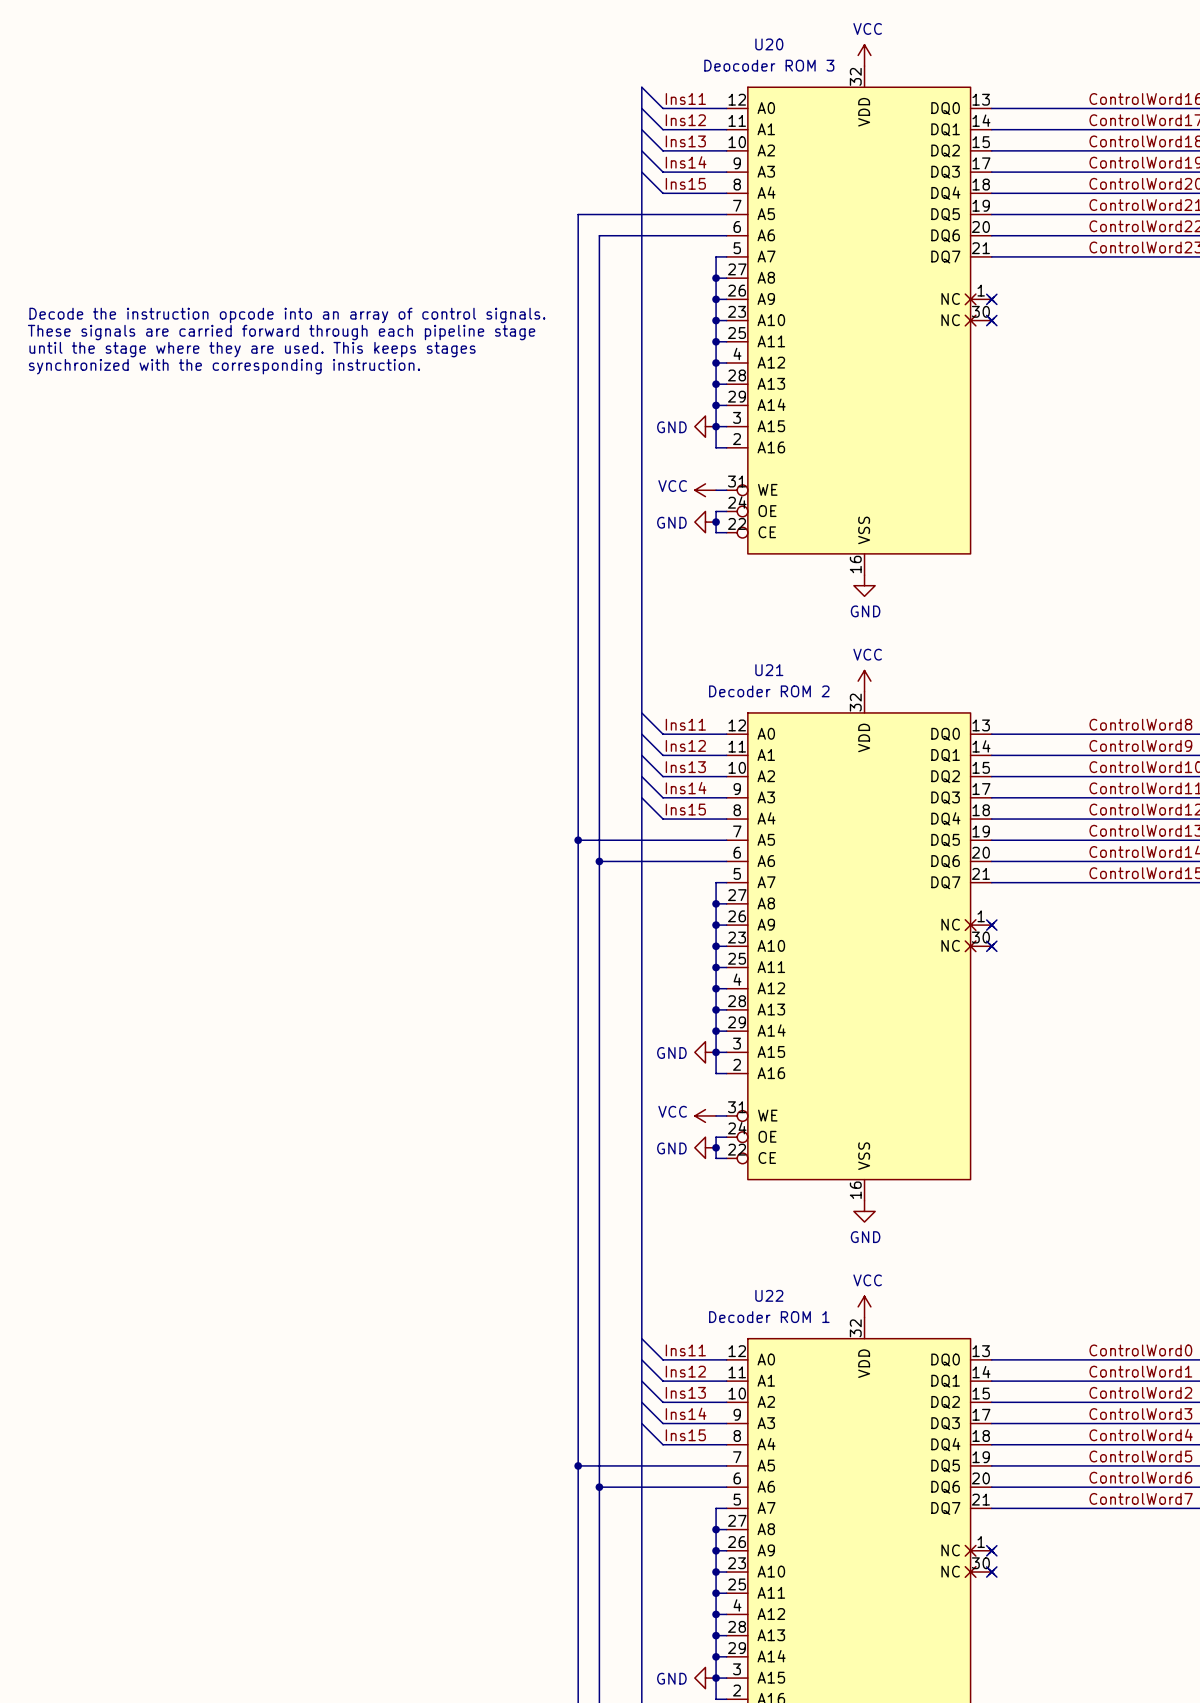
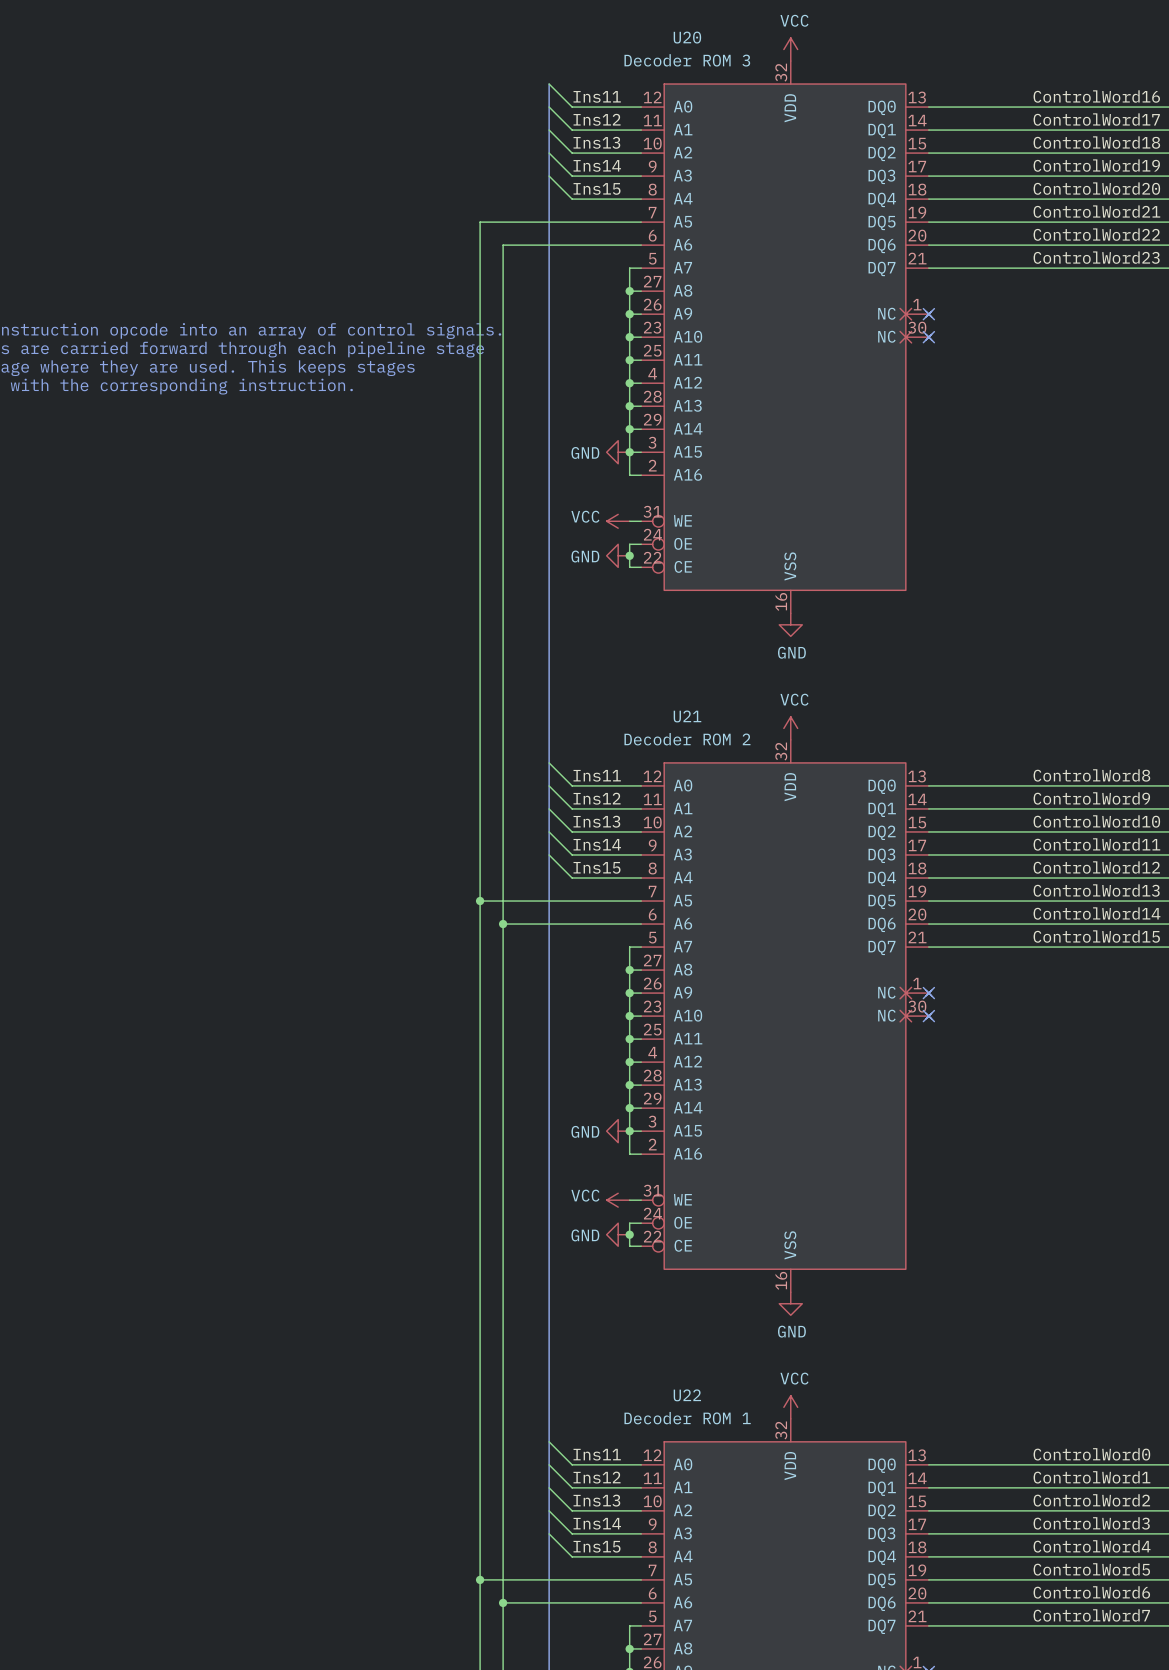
U20 value: Deocoder ROM 3 (769, 65) -> Decoder ROM 3 (687, 60)

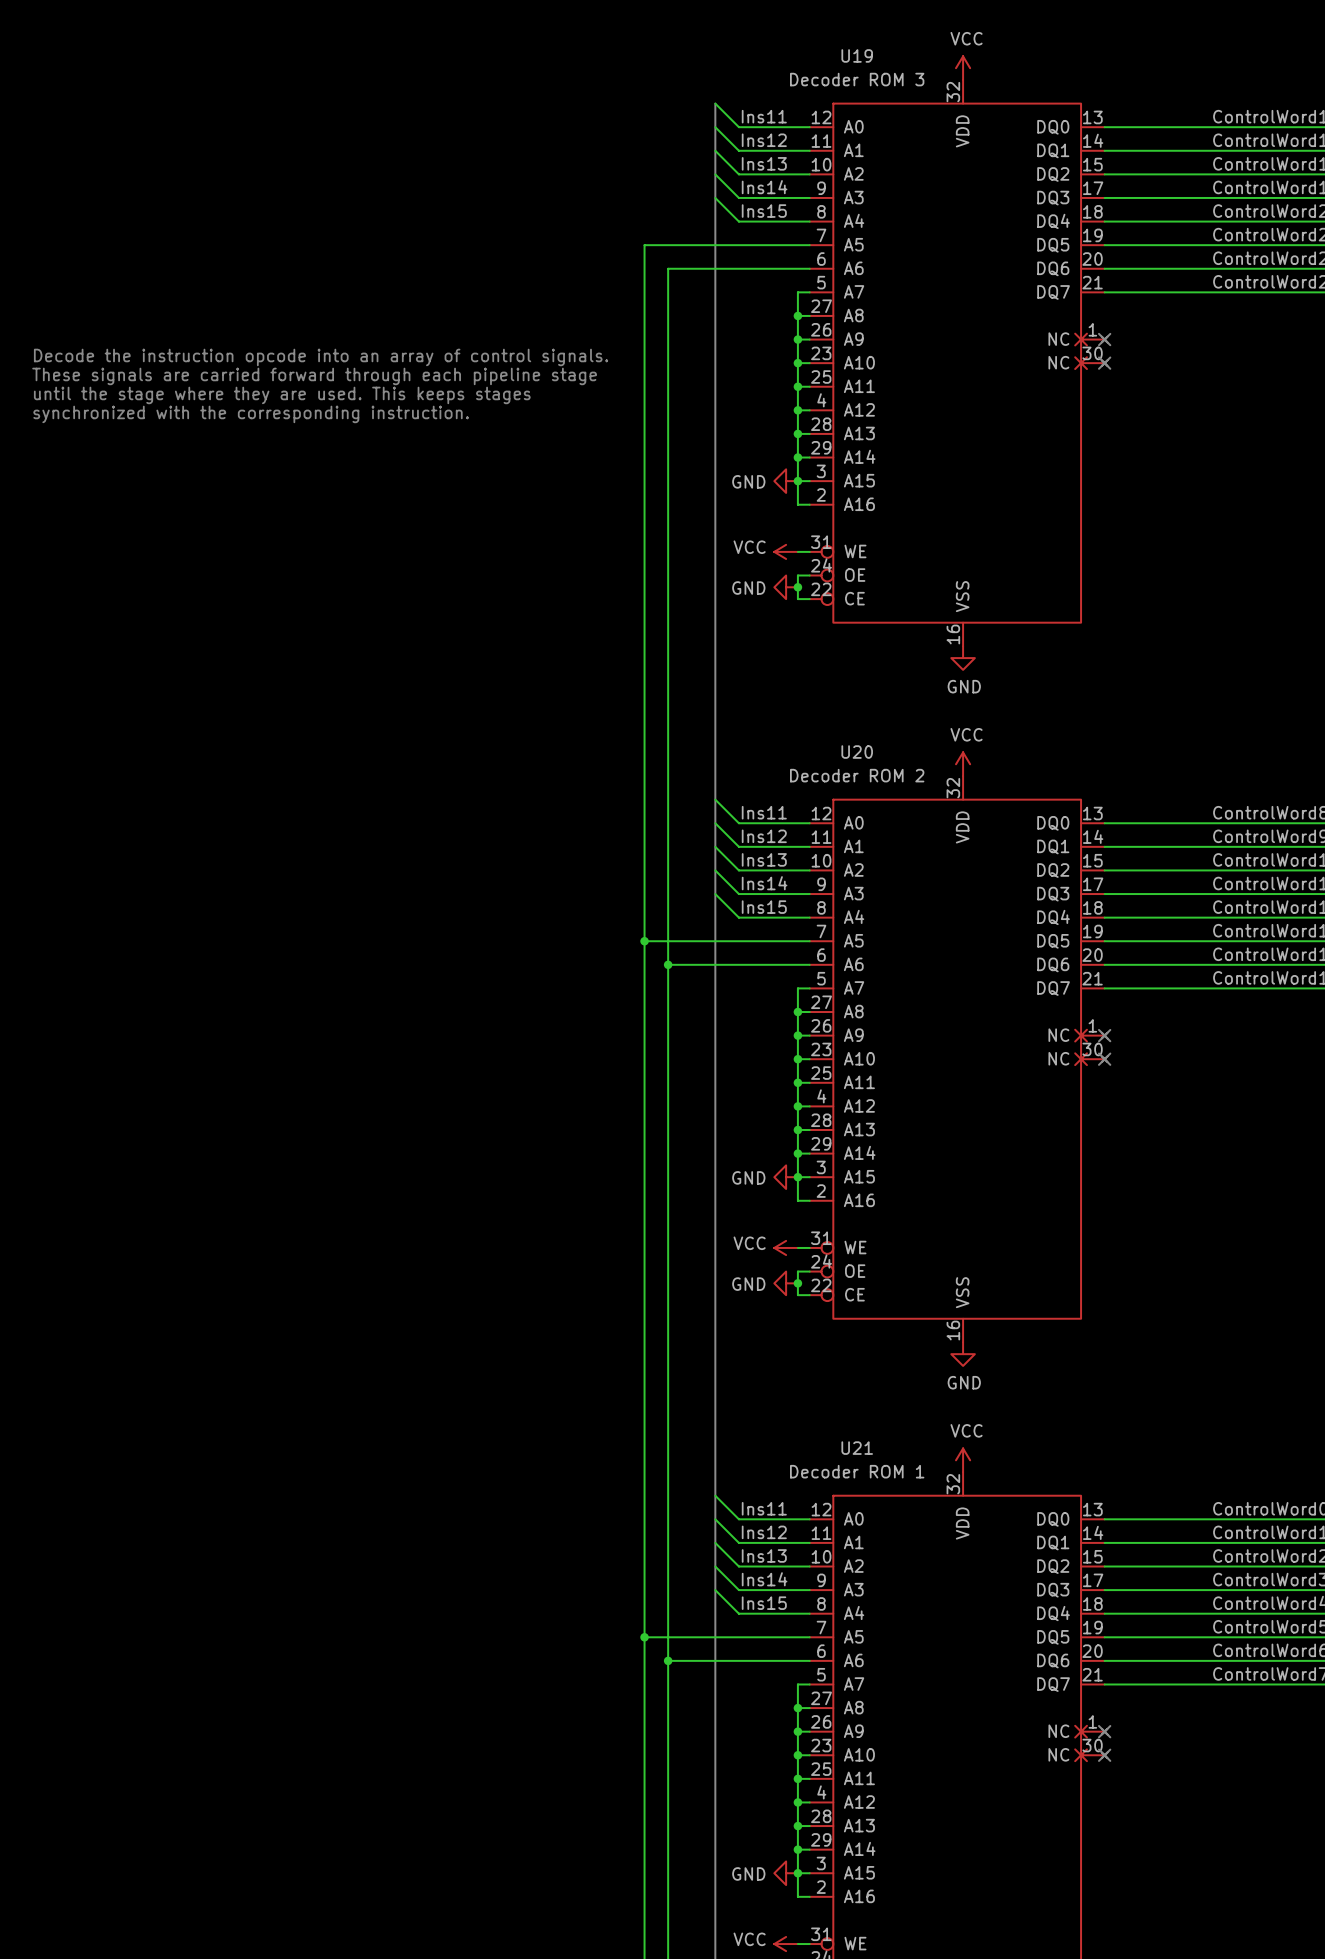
U20 name: U20 (687, 37) -> U19 (857, 55)
U21 name: U21 (687, 716) -> U20 (857, 752)
U22 name: U22 (687, 1395) -> U21 (857, 1448)

